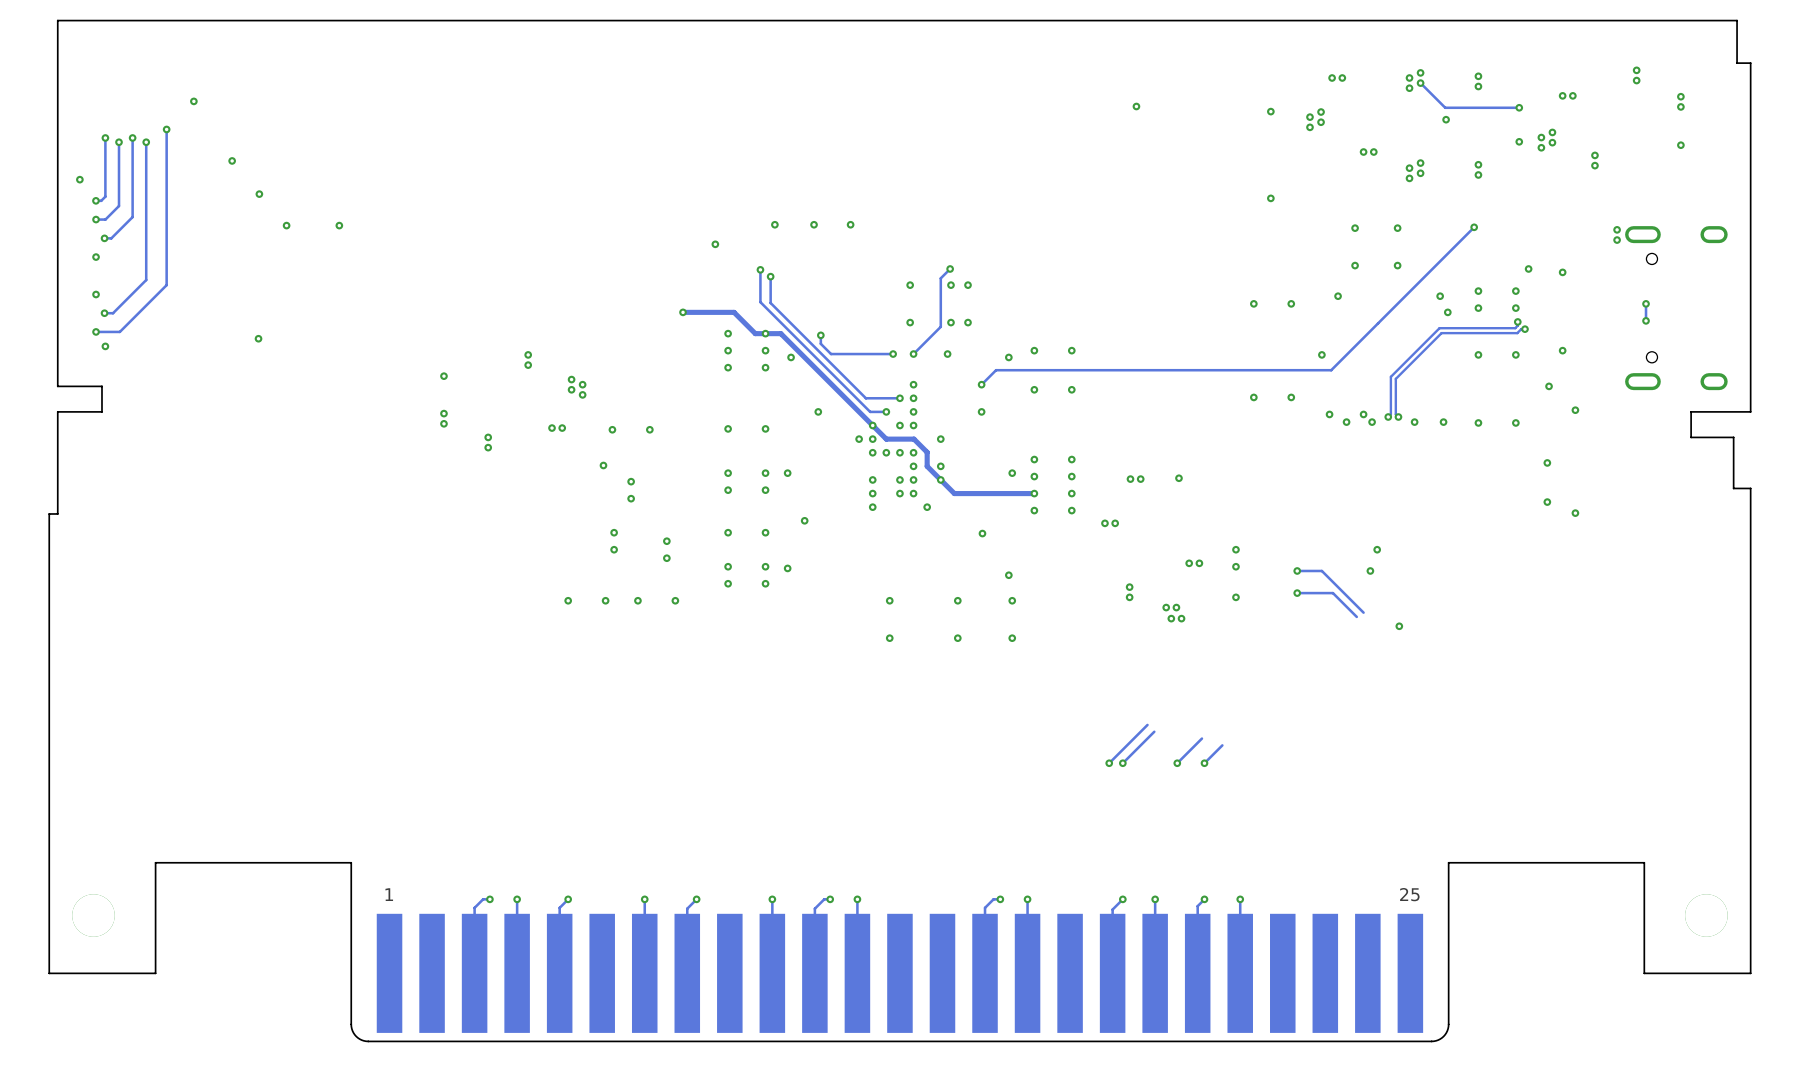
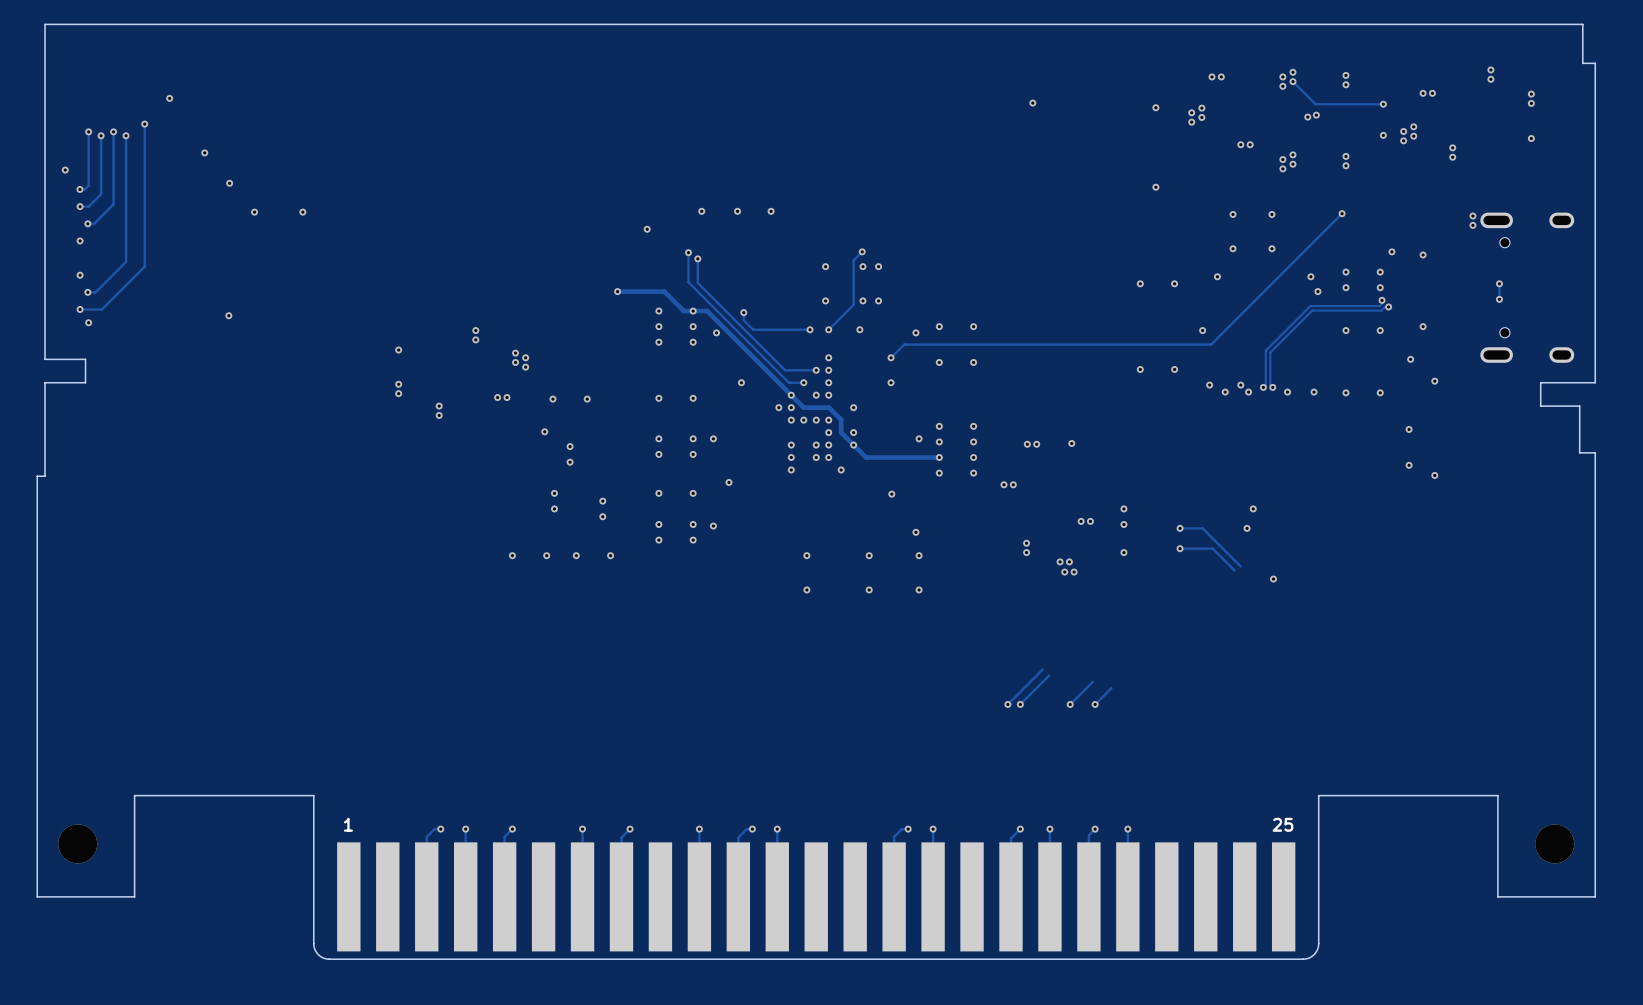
via: none -> (1307, 117)

